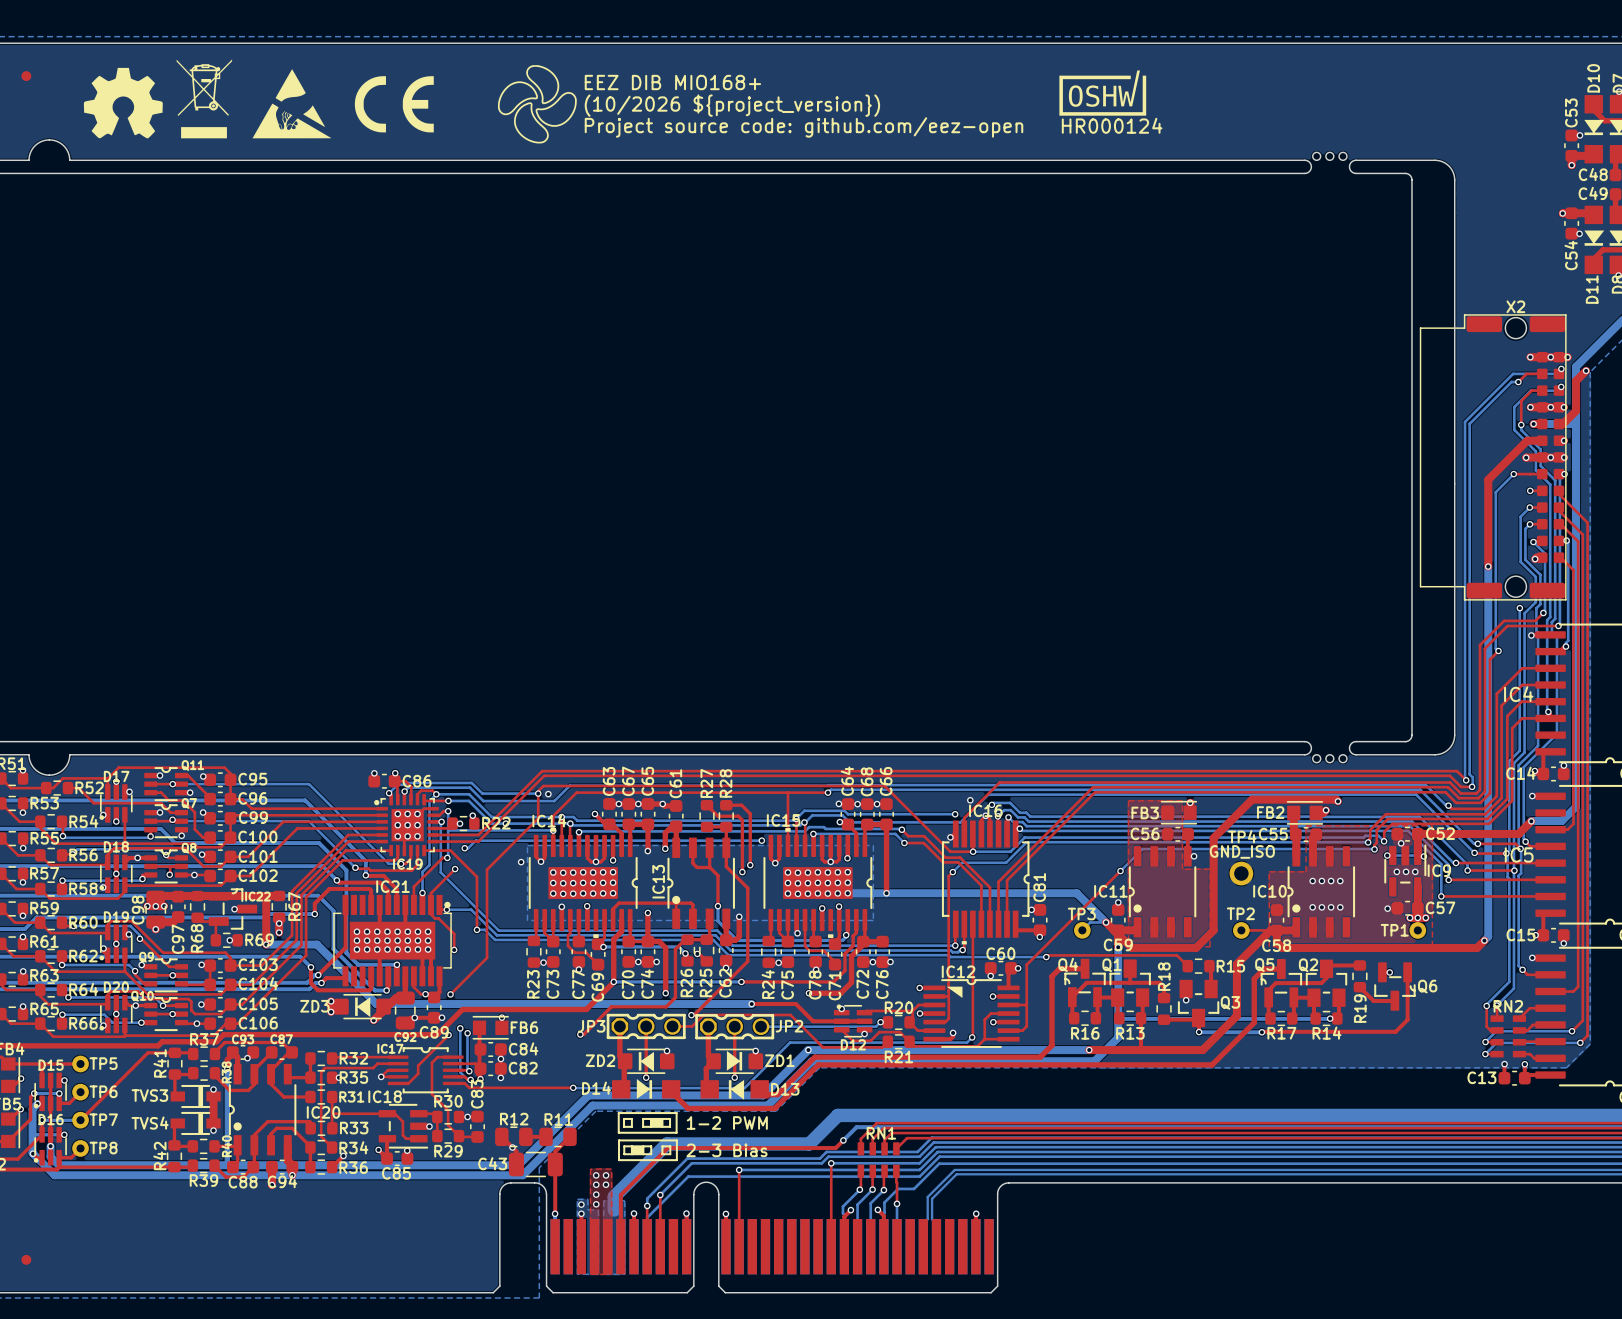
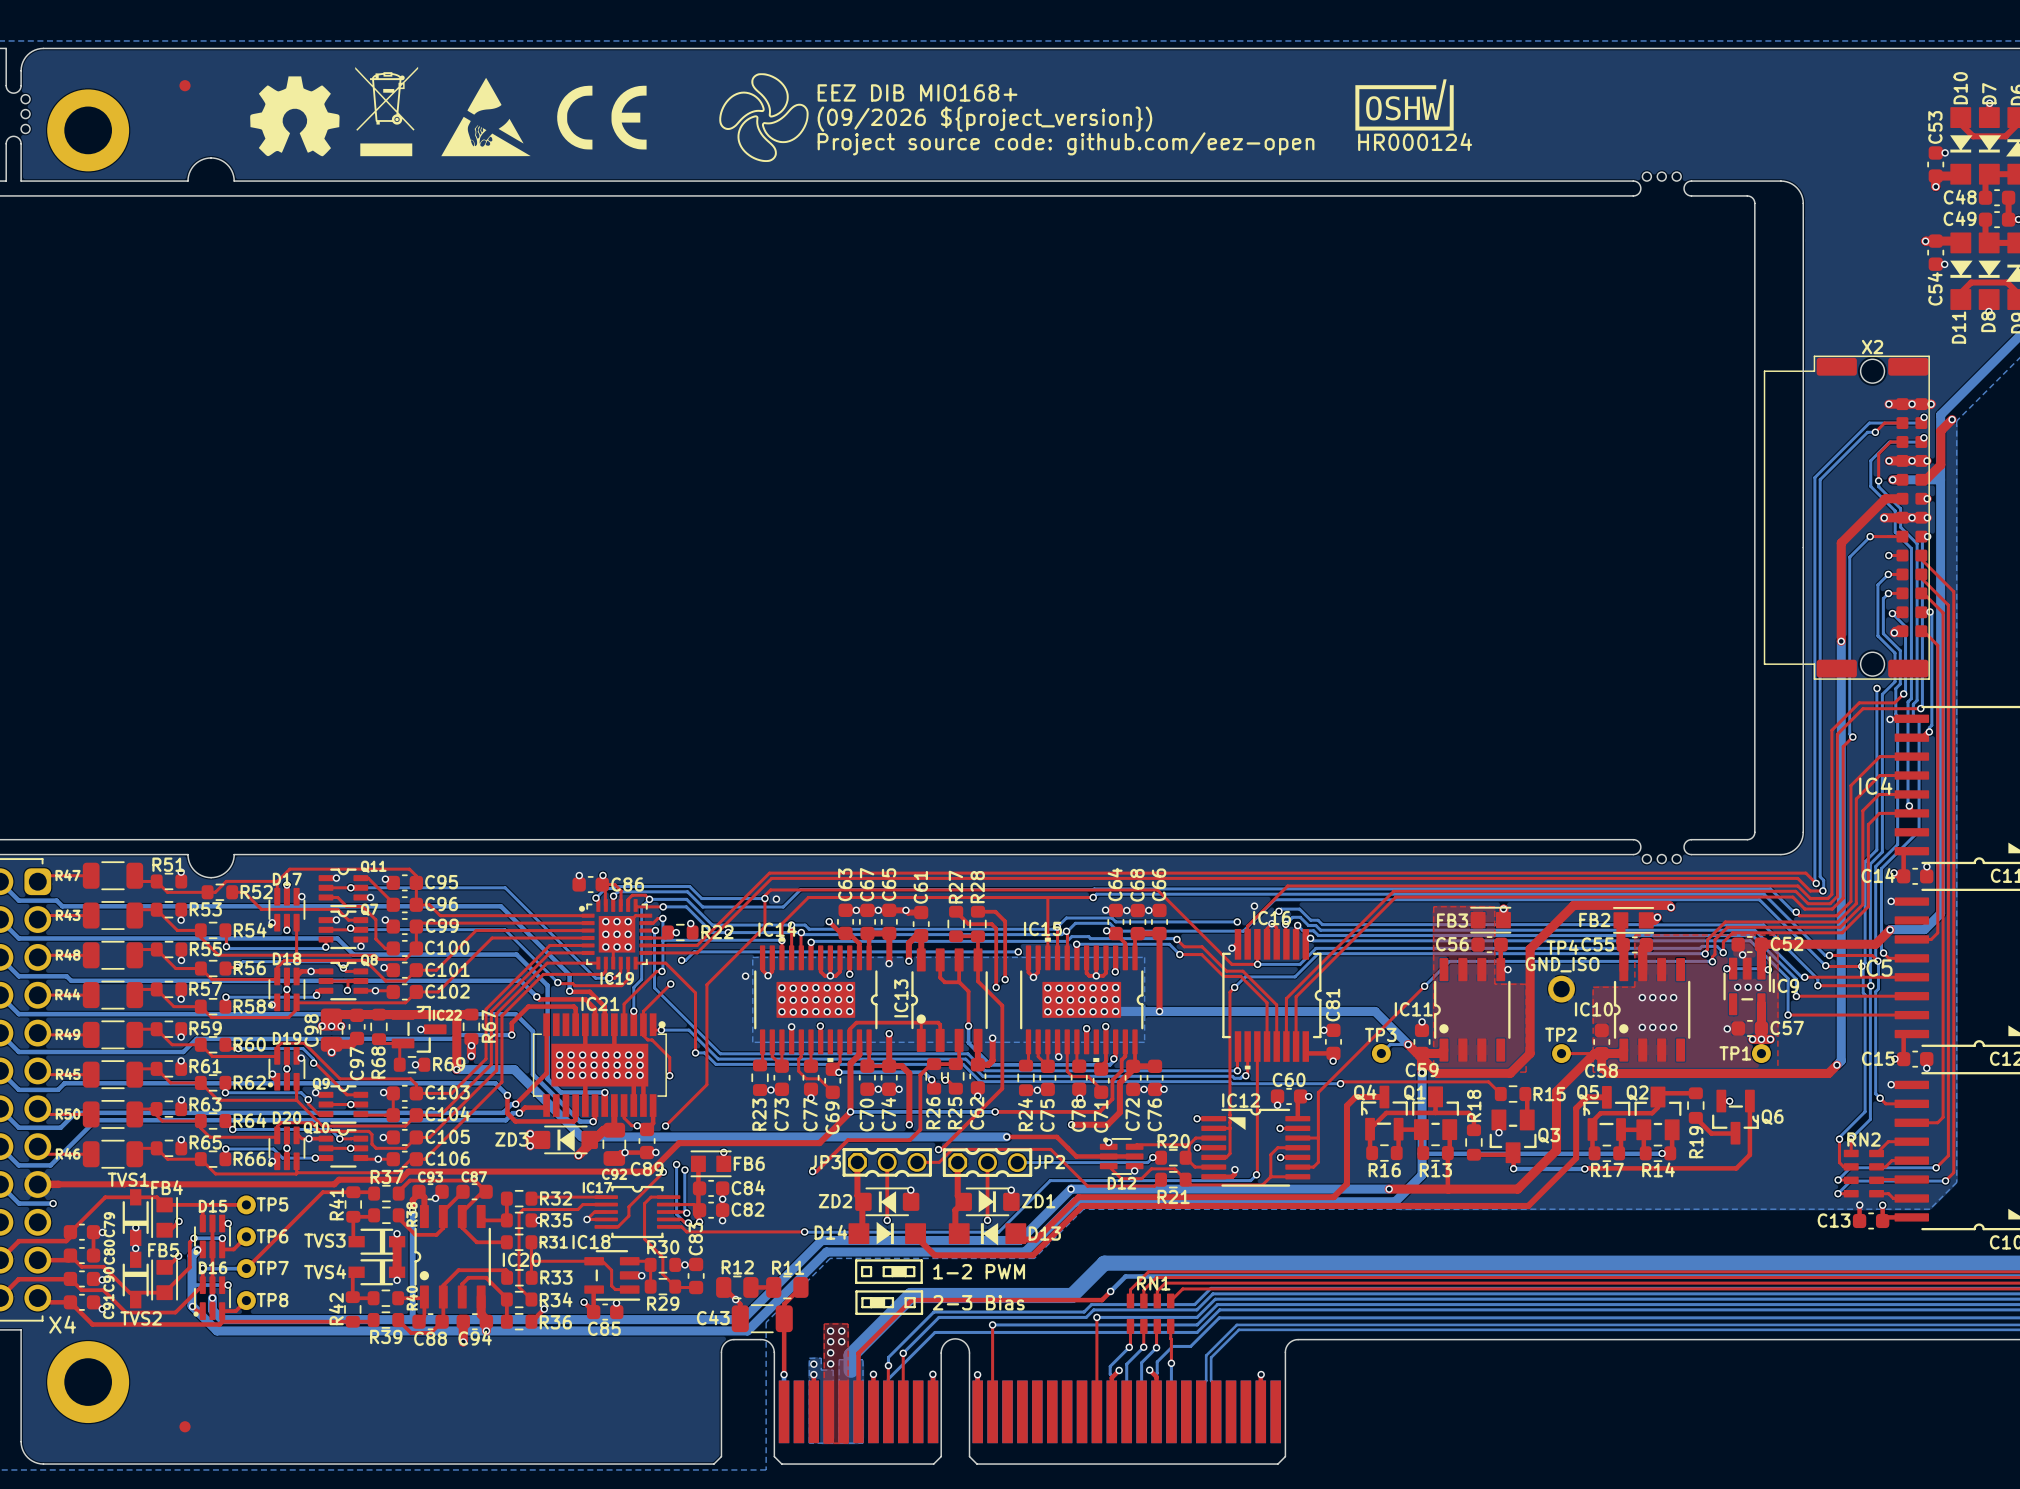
text: (10/2026 ${project_version}) (732, 105) -> (09/2026 ${project_version}) (984, 119)

